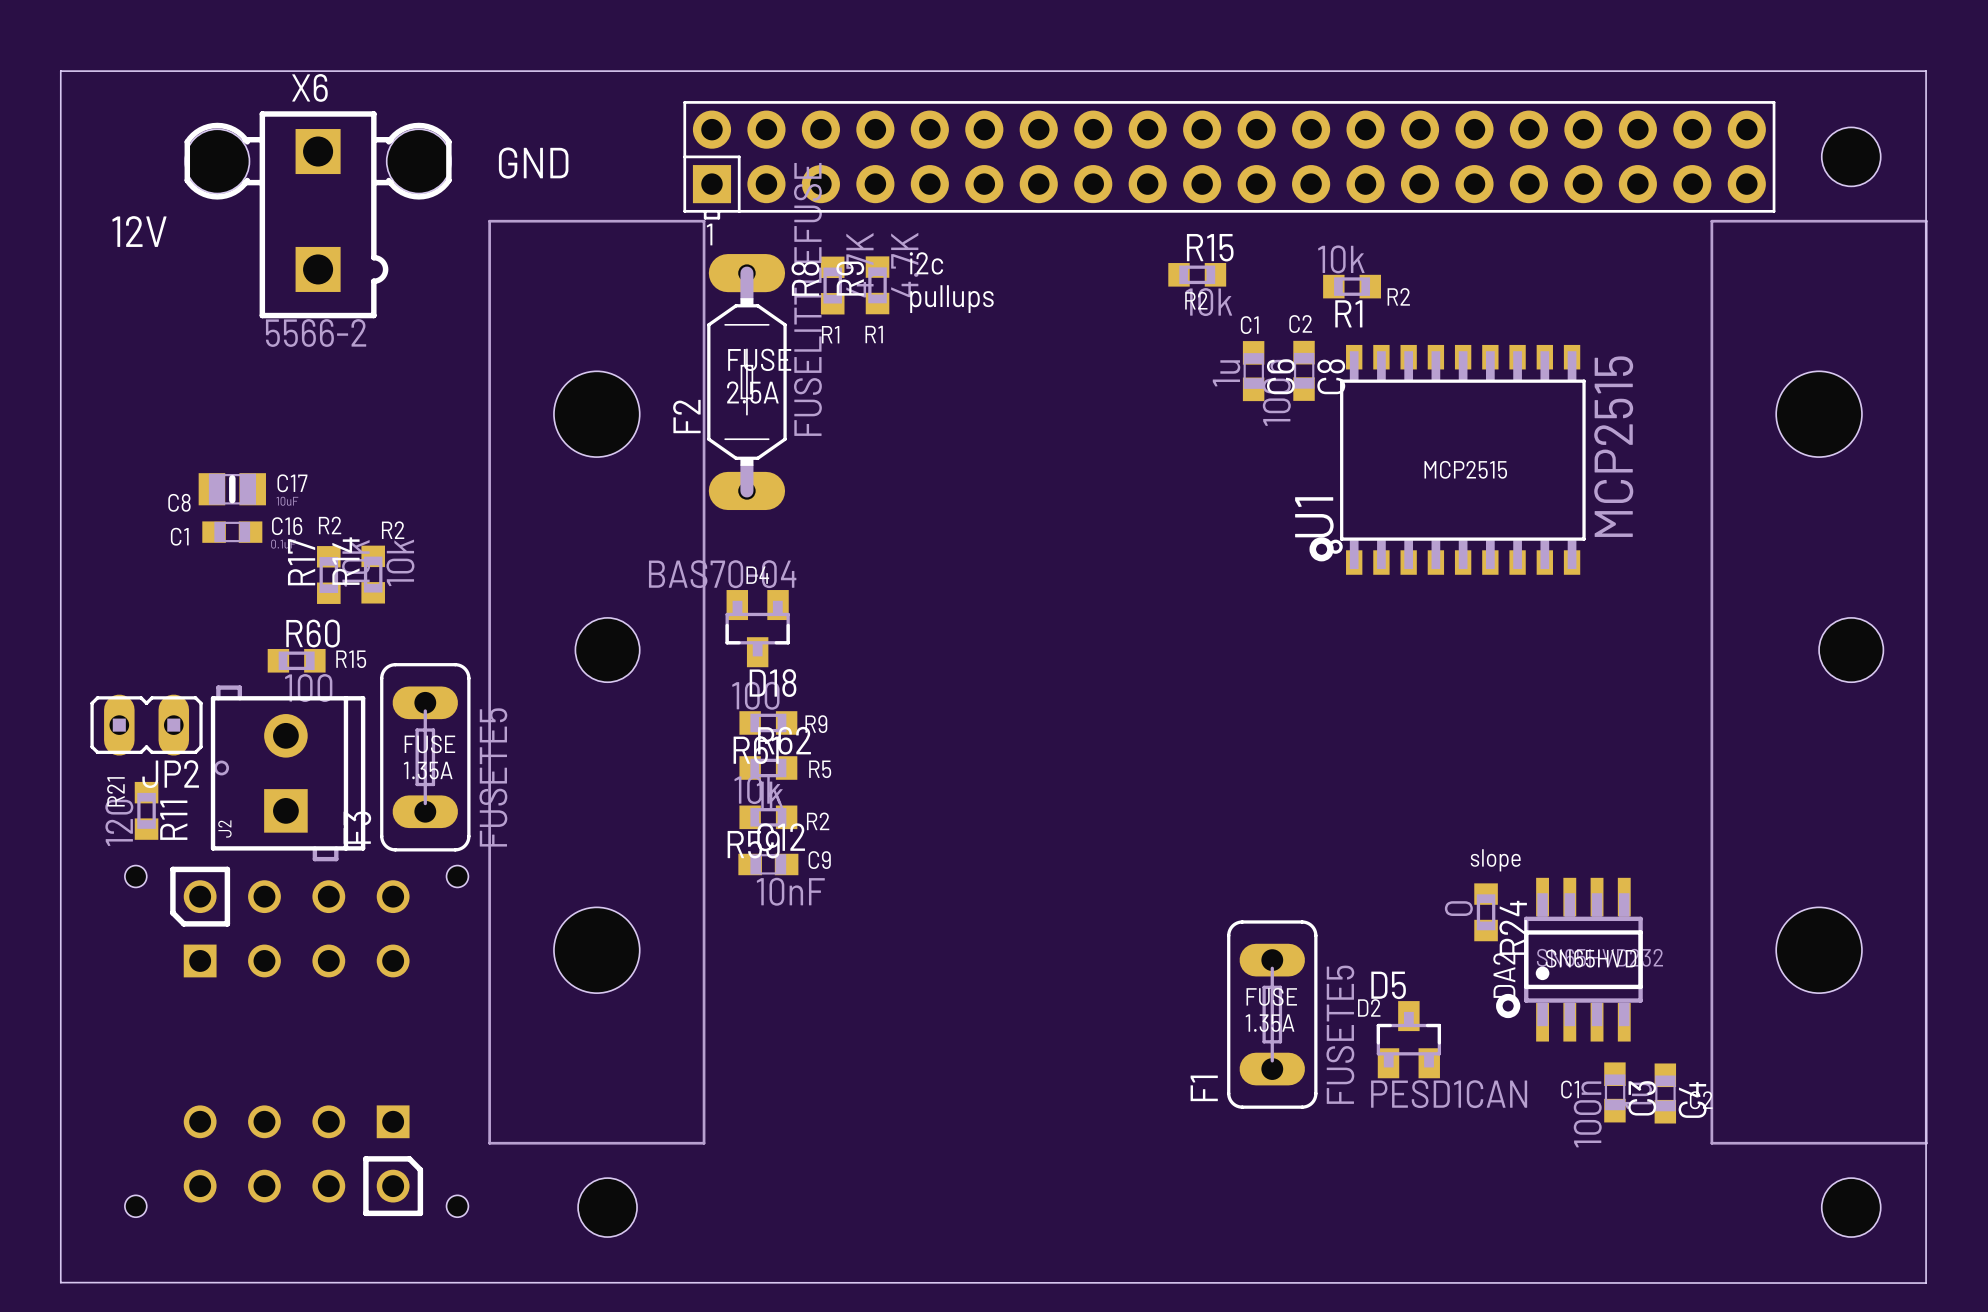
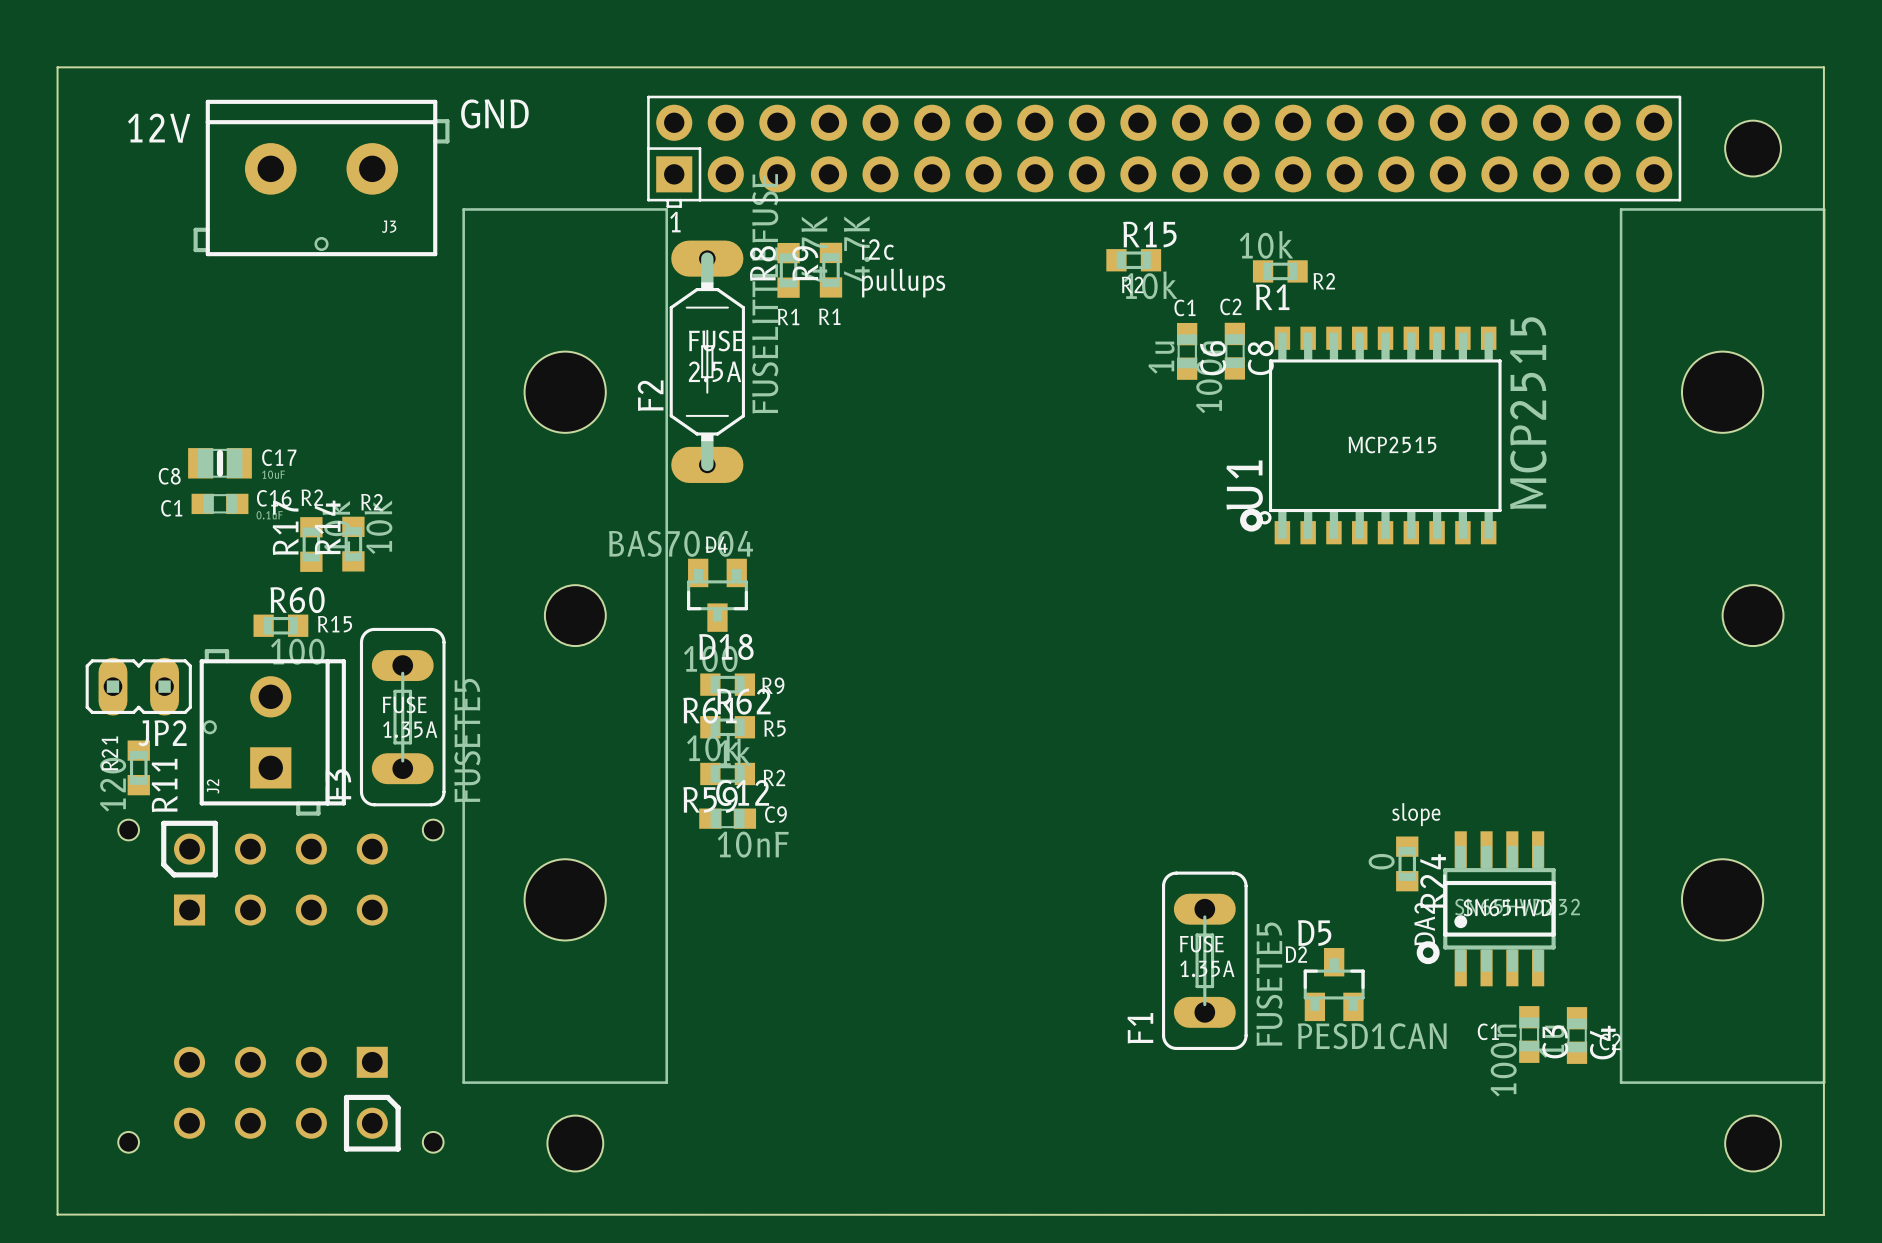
text position: GND (533, 163) -> GND (494, 113)
J3: none -> (321, 178)
X6: 5566-2 (318, 214) -> none
text position: 12V (139, 231) -> 12V (159, 128)

